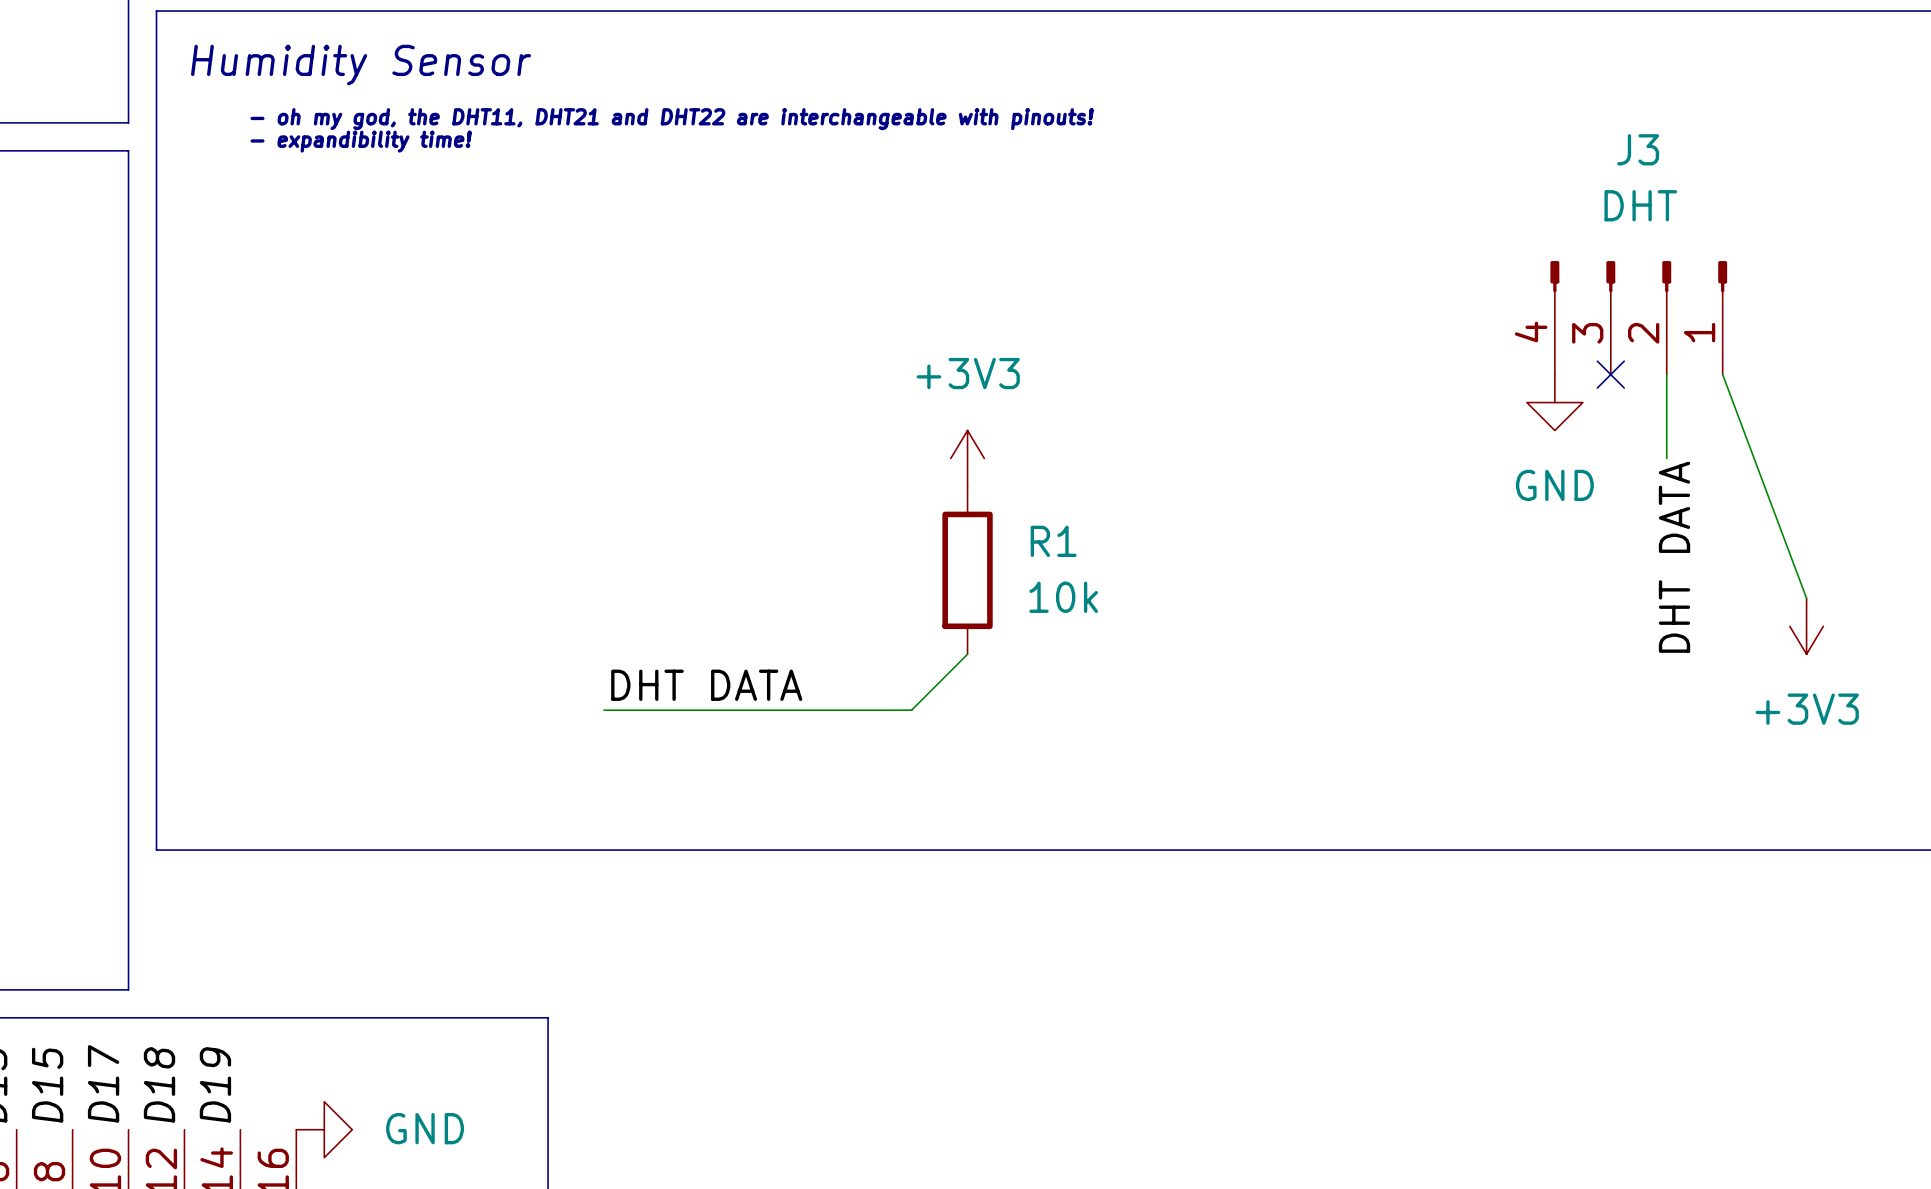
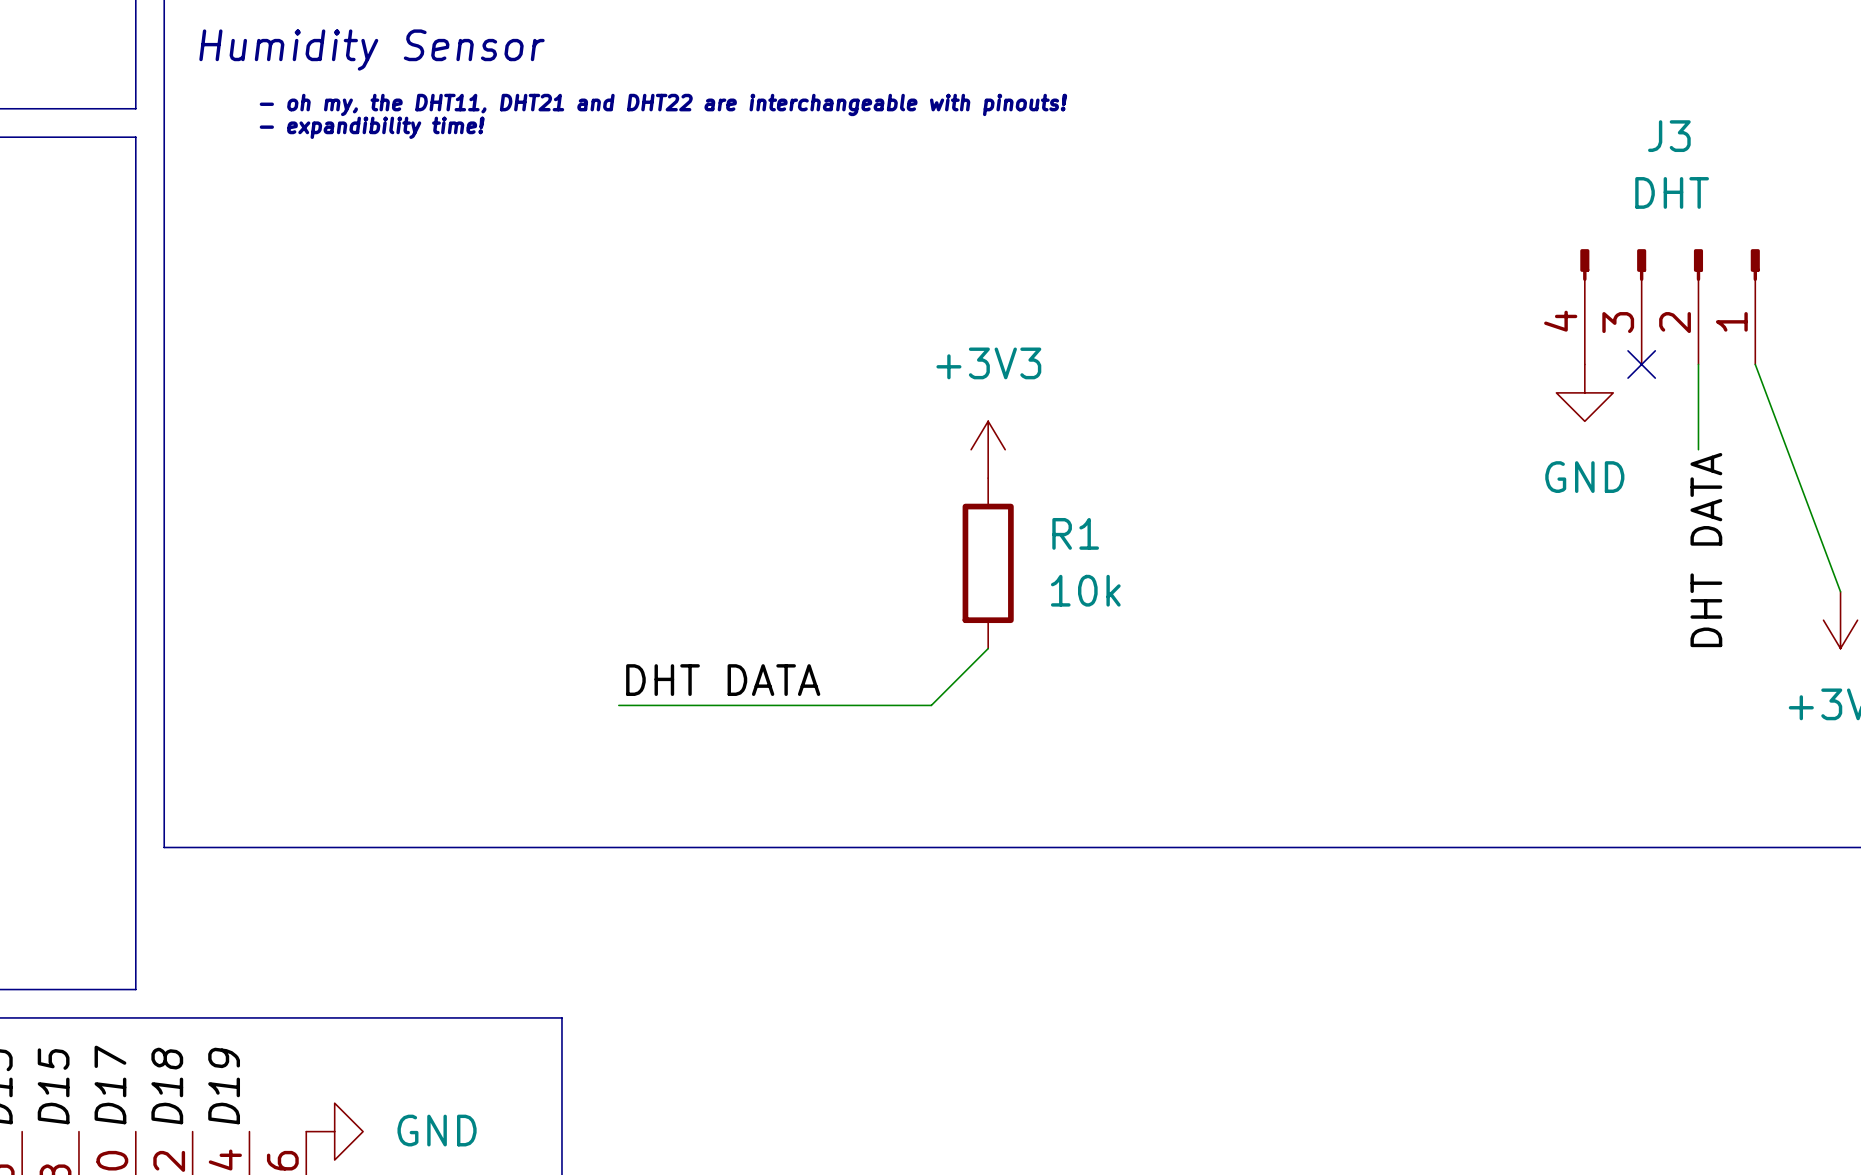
text: - oh my god, the DHT11, DHT21 and DHT22 are interchangeable with pinouts! (672, 119) -> - oh my, the DHT11, DHT21 and DHT22 are interchangeable with pinouts! (663, 104)

